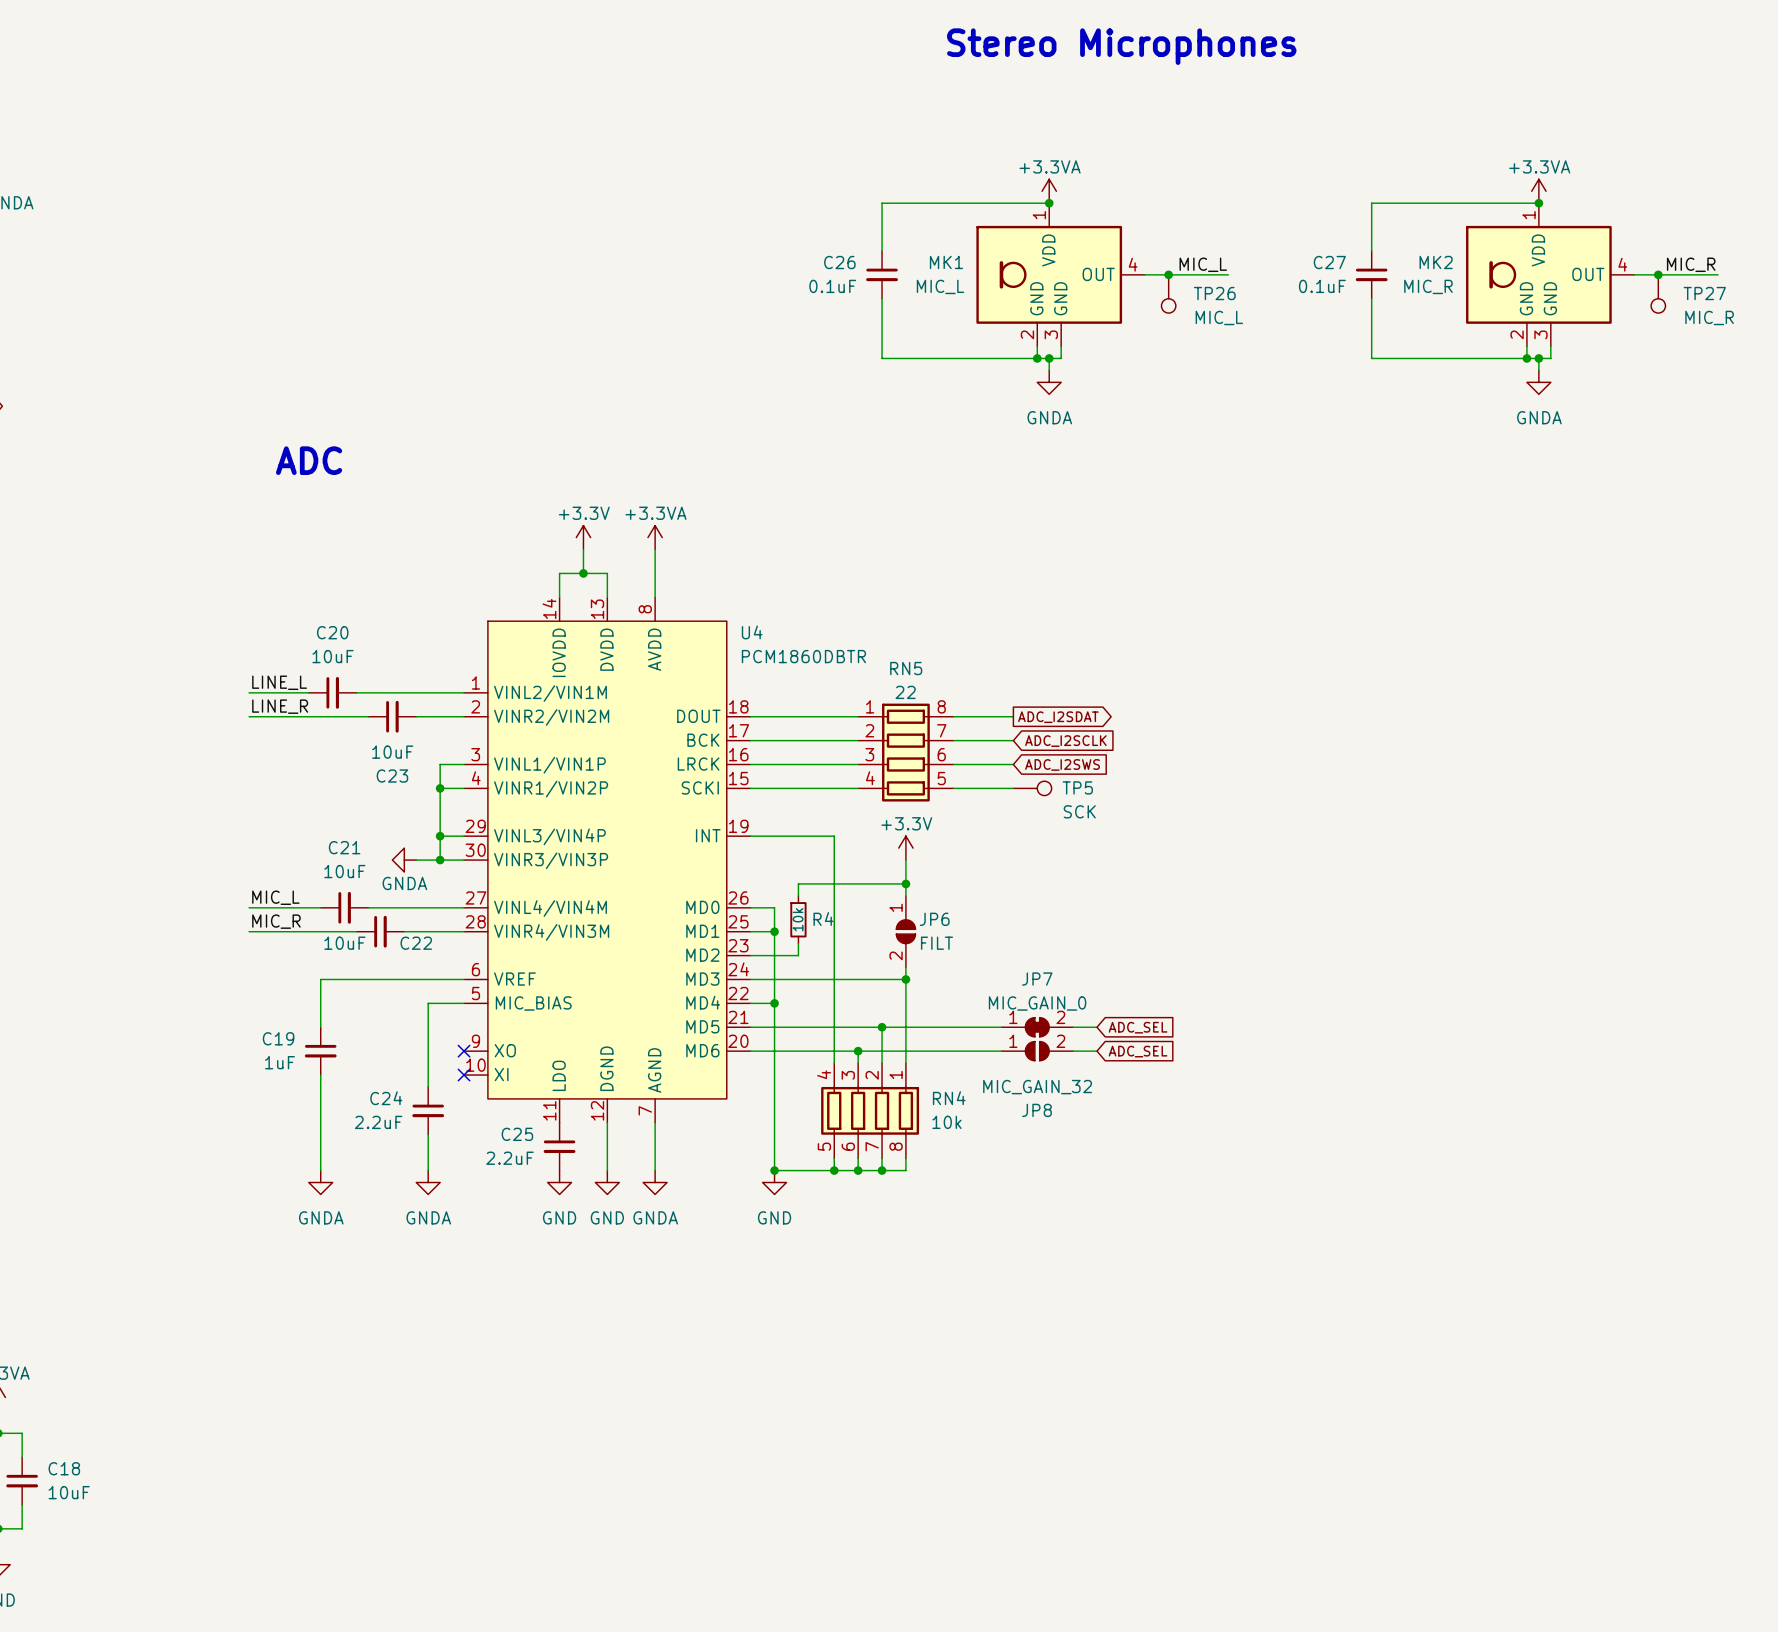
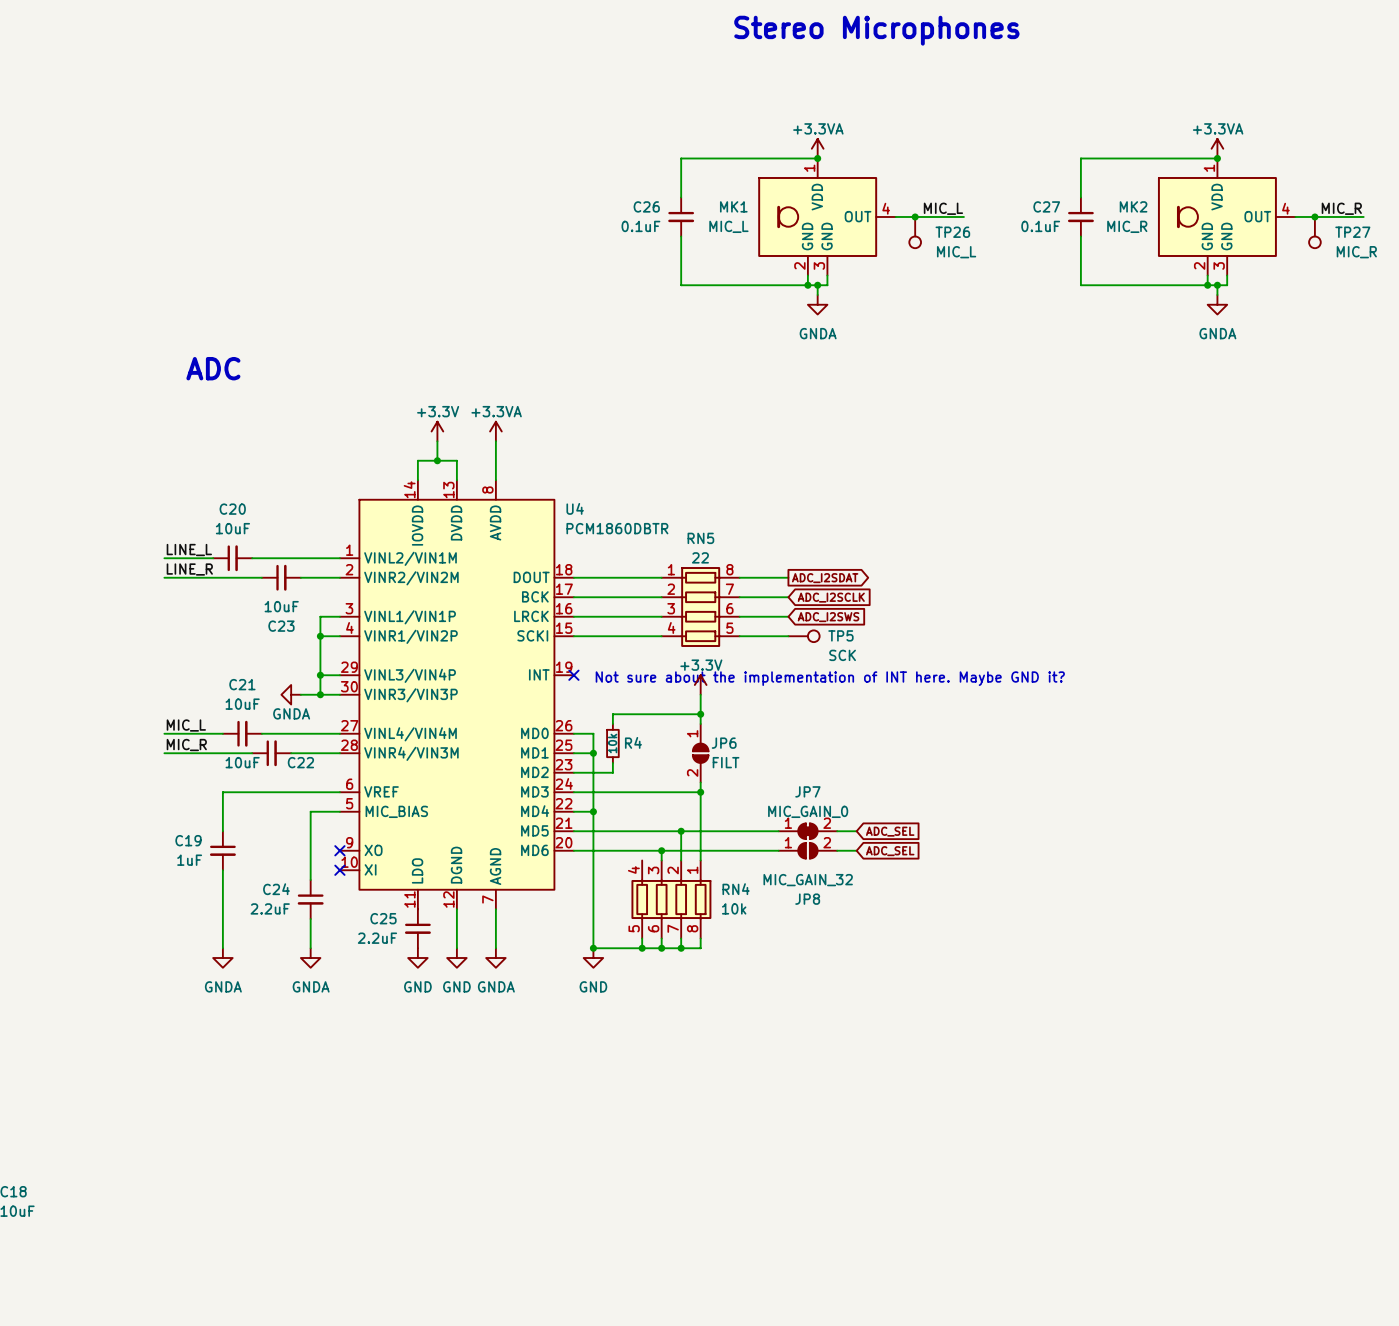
wire: (750, 836) (834, 836) (834, 1063) -> none
no-connect mark: none -> (573, 675)
text: none -> Not sure about the implementation of INT here. Maybe GND it? (830, 678)

